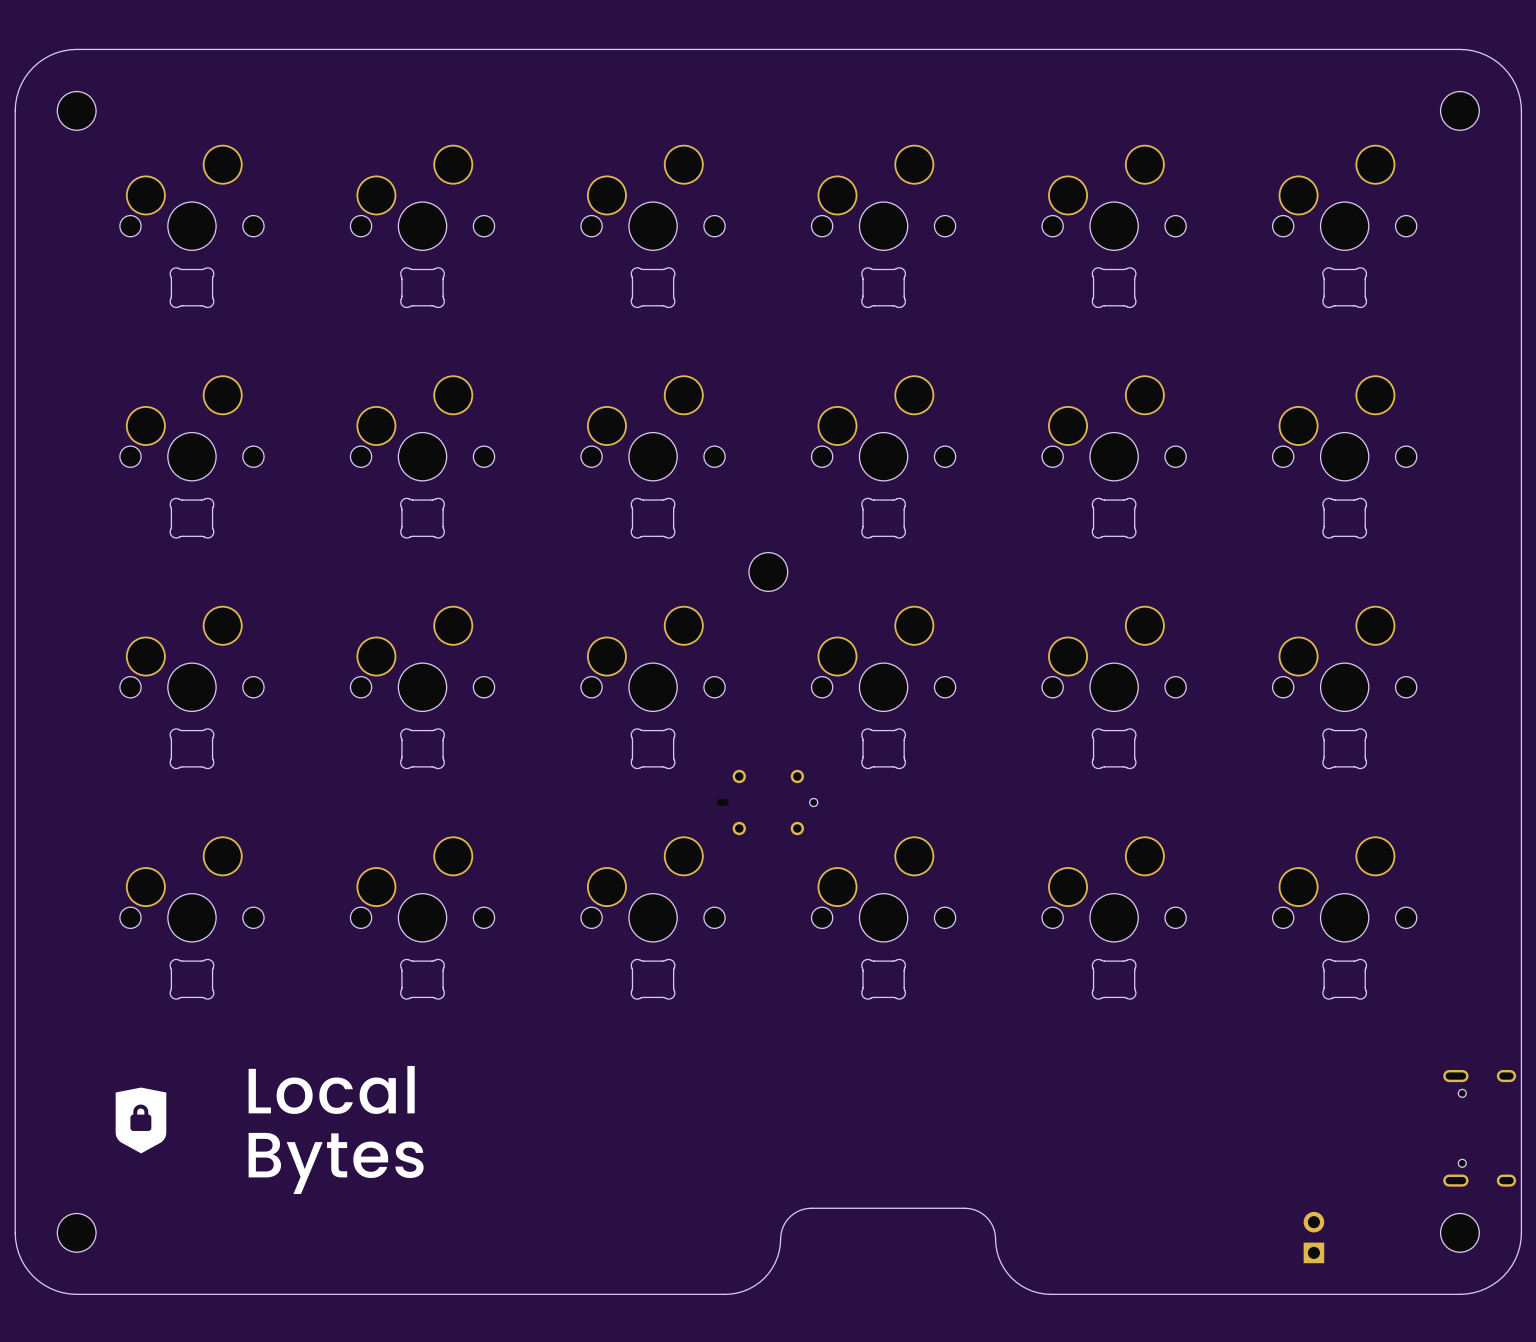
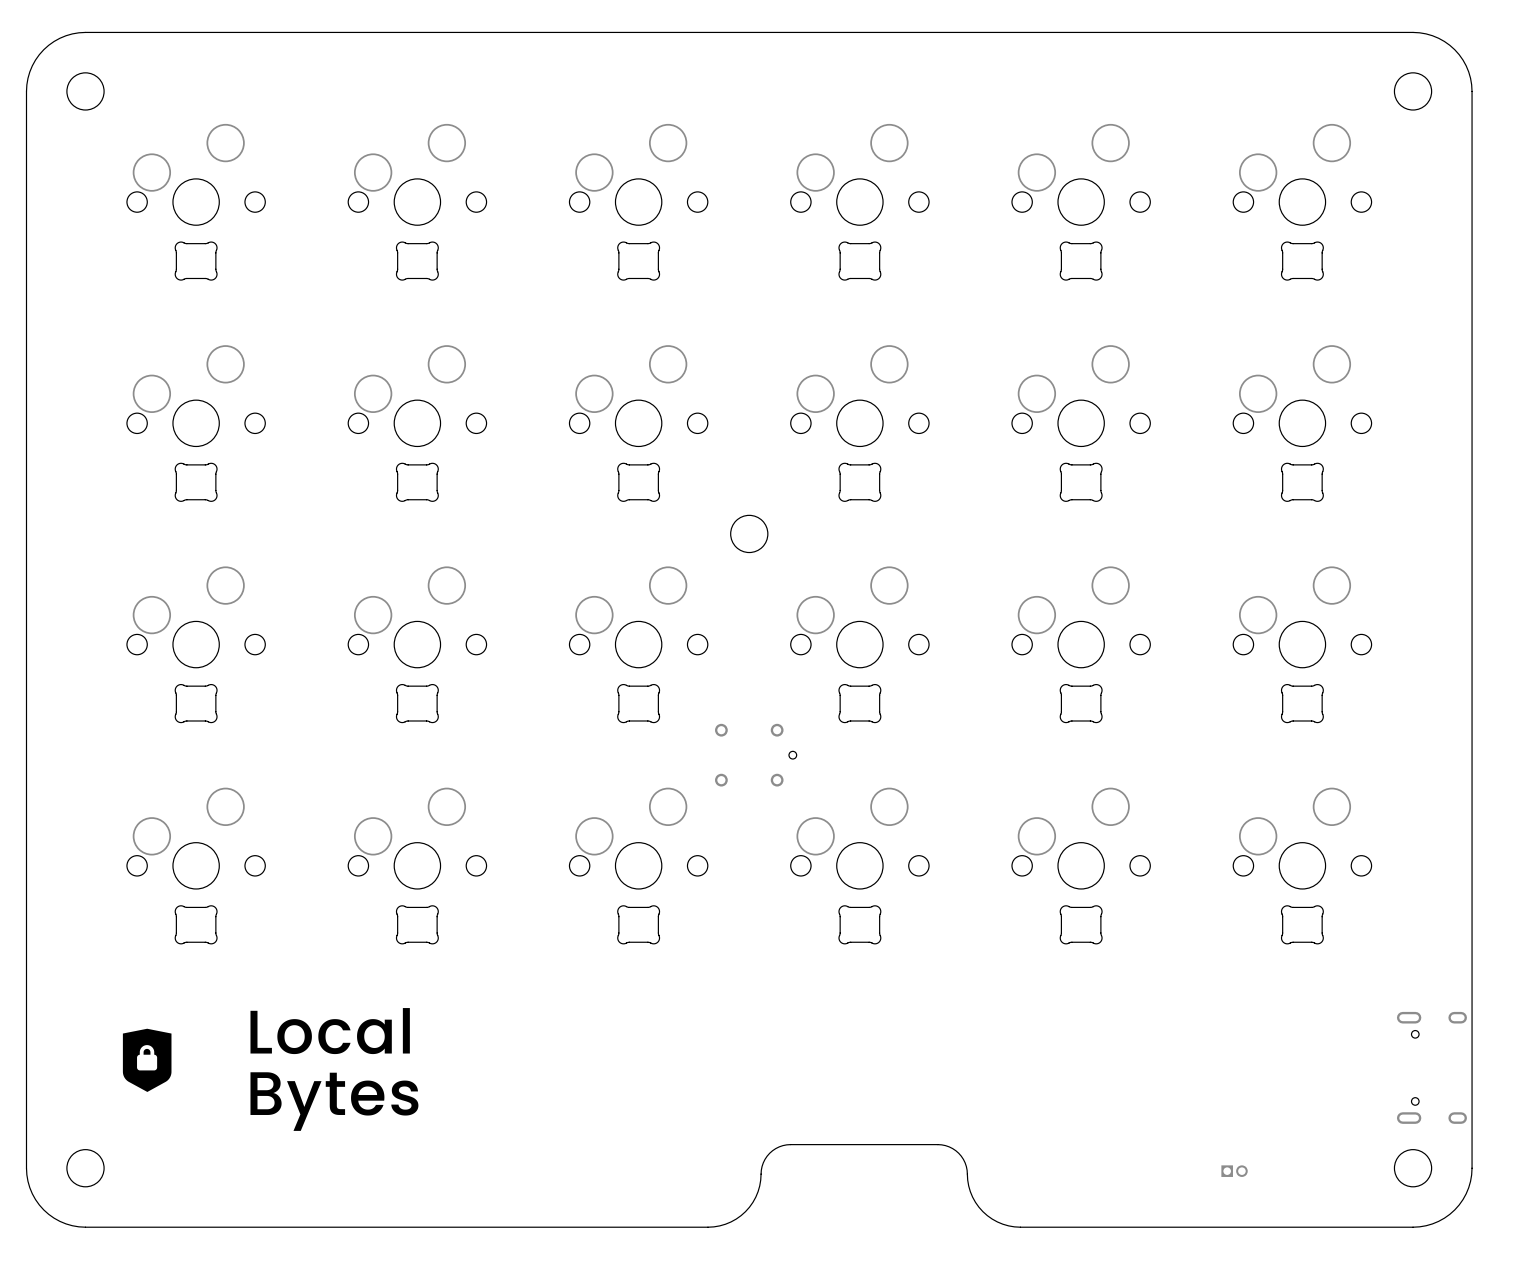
part: none -> (1234, 1171)
part: (1313, 1237) -> none

